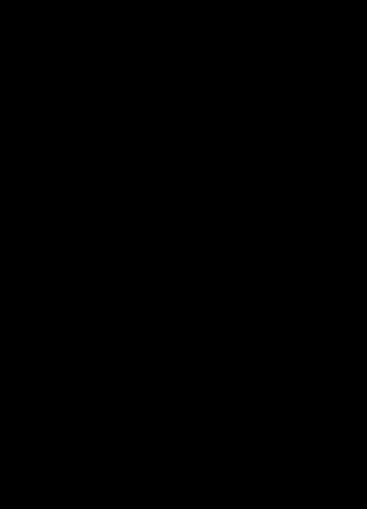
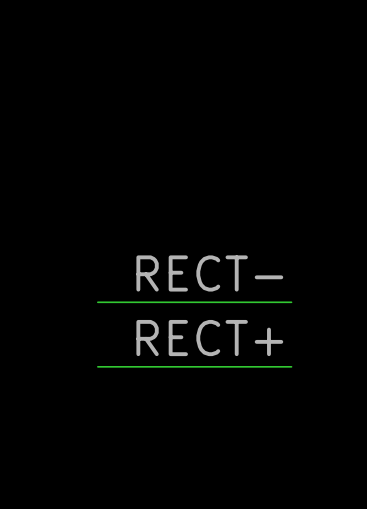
label: none -> RECT- (209, 273)
wire: none -> (97, 302) (291, 302)
label: none -> RECT+ (209, 338)
wire: none -> (97, 366) (291, 366)

